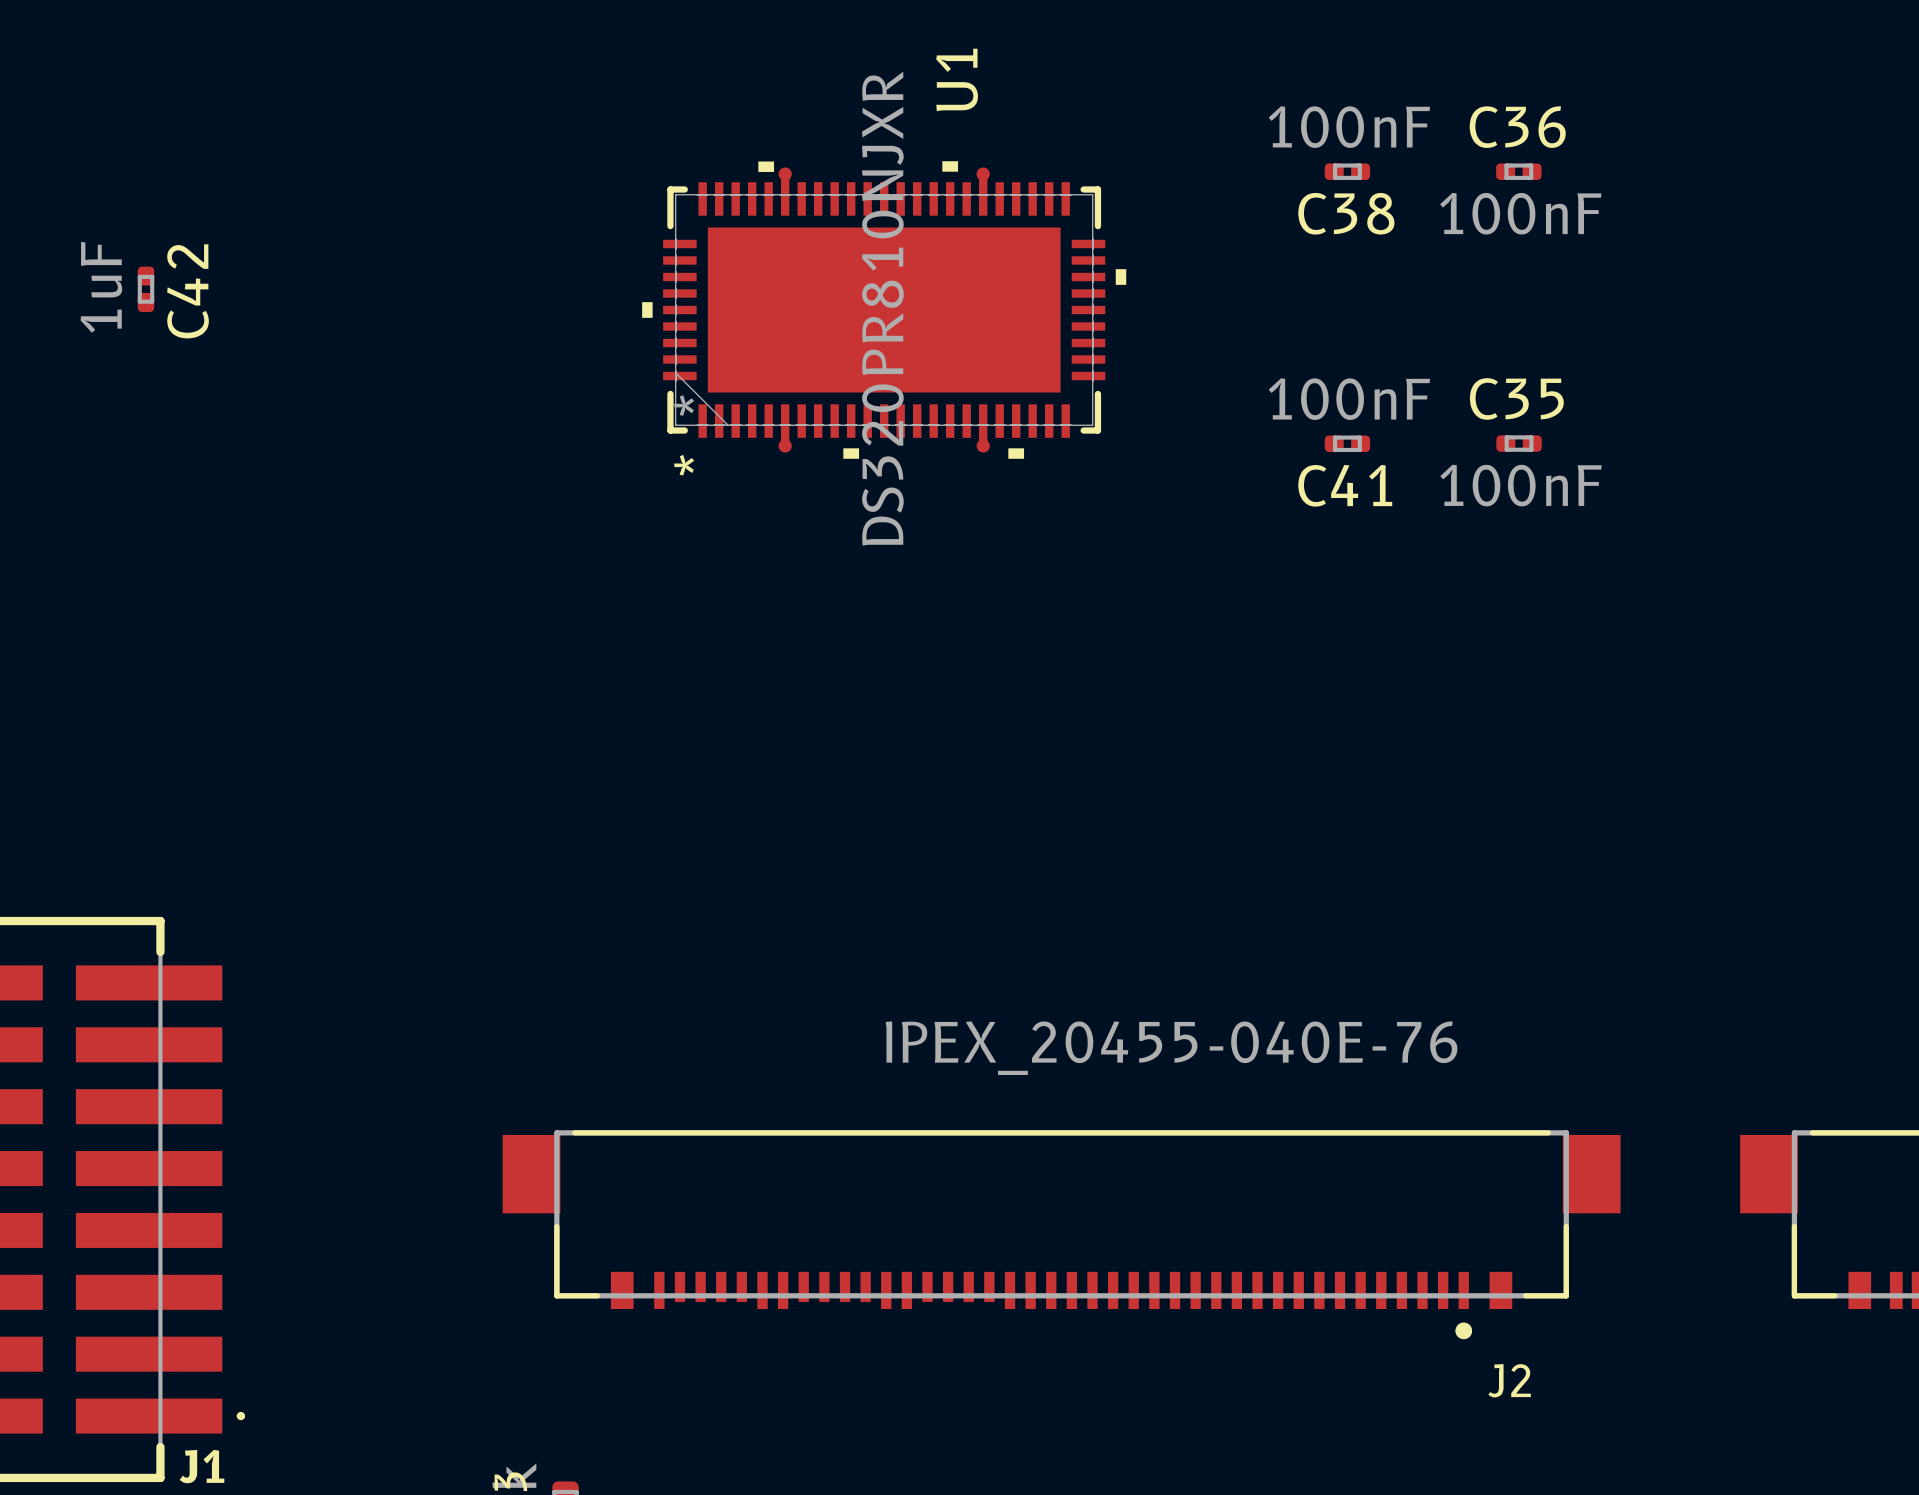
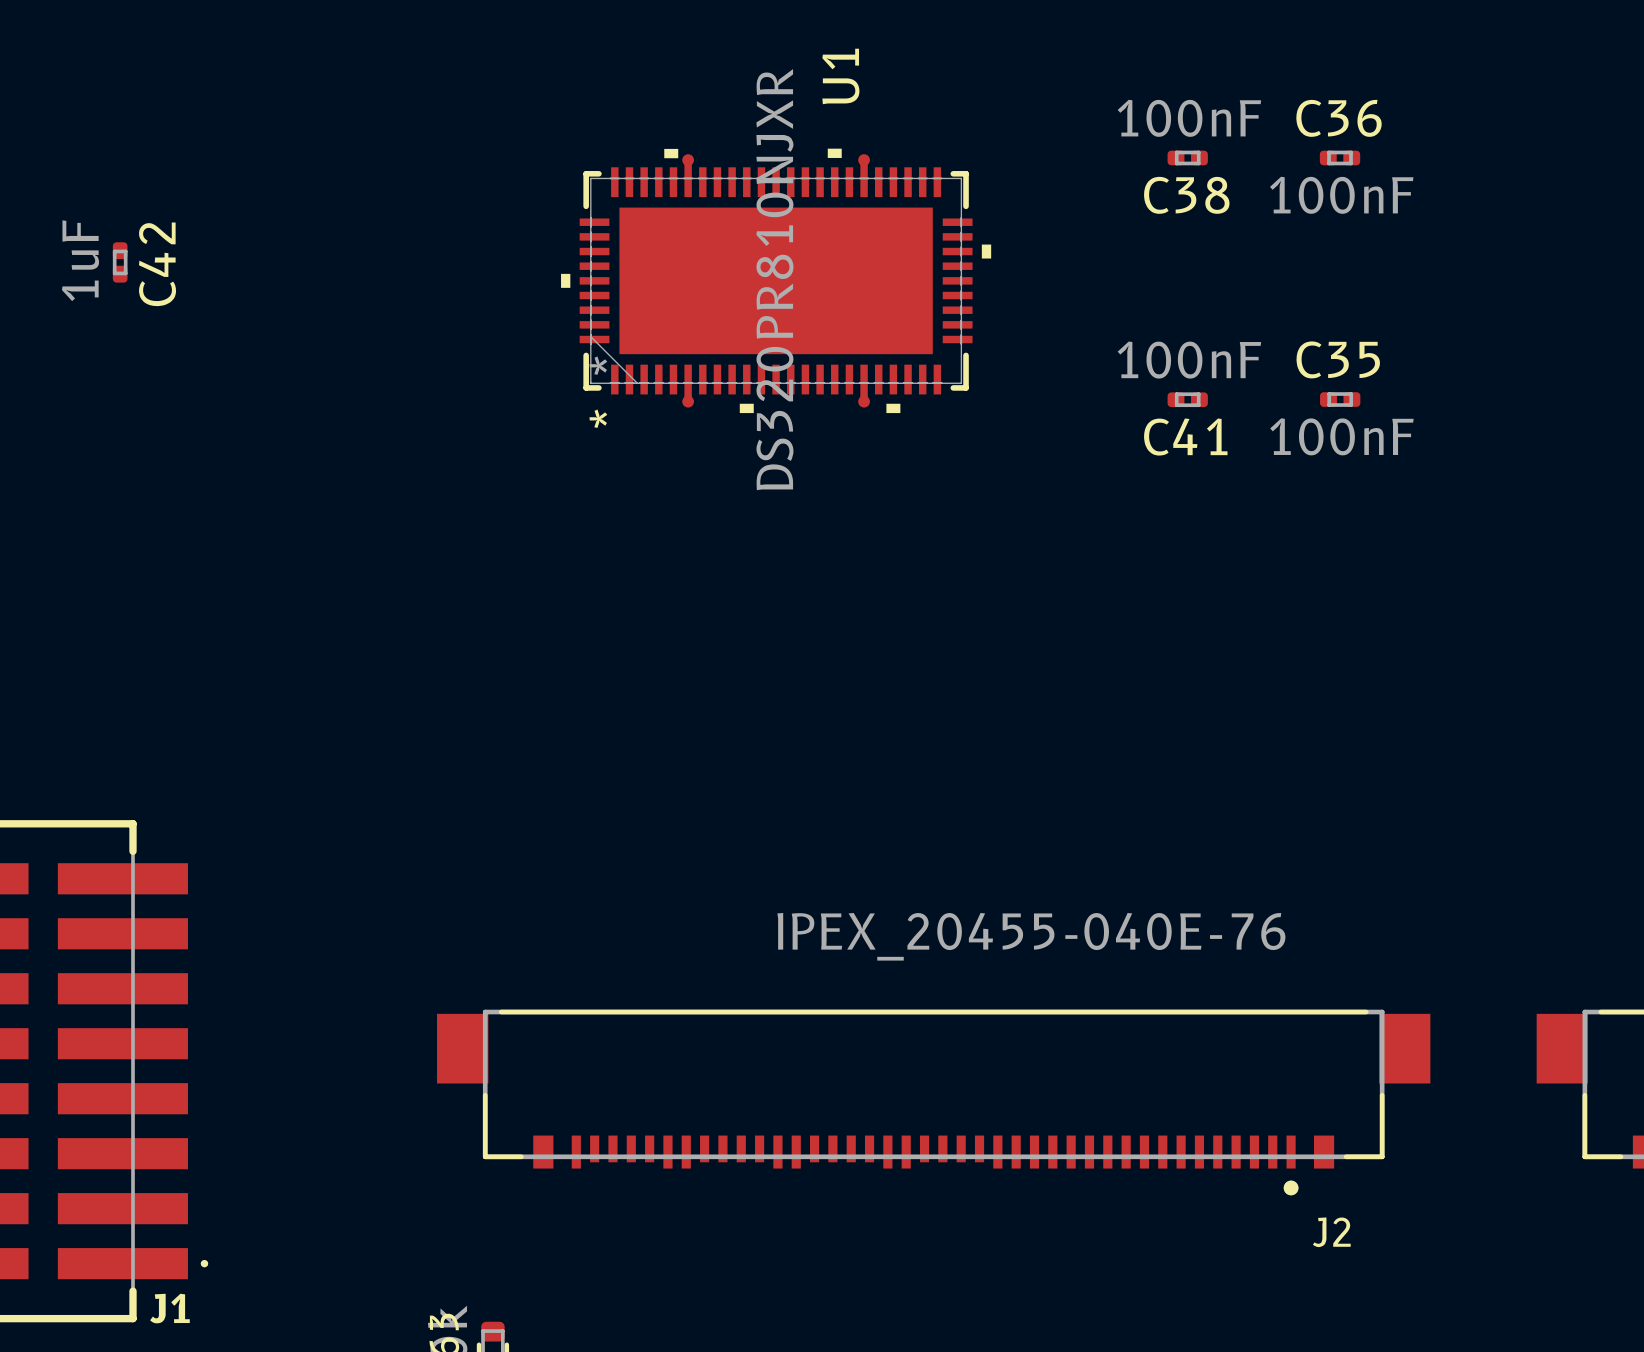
J2 footprint: [502, 1130, 1621, 1340] -> [437, 1009, 1431, 1196]

